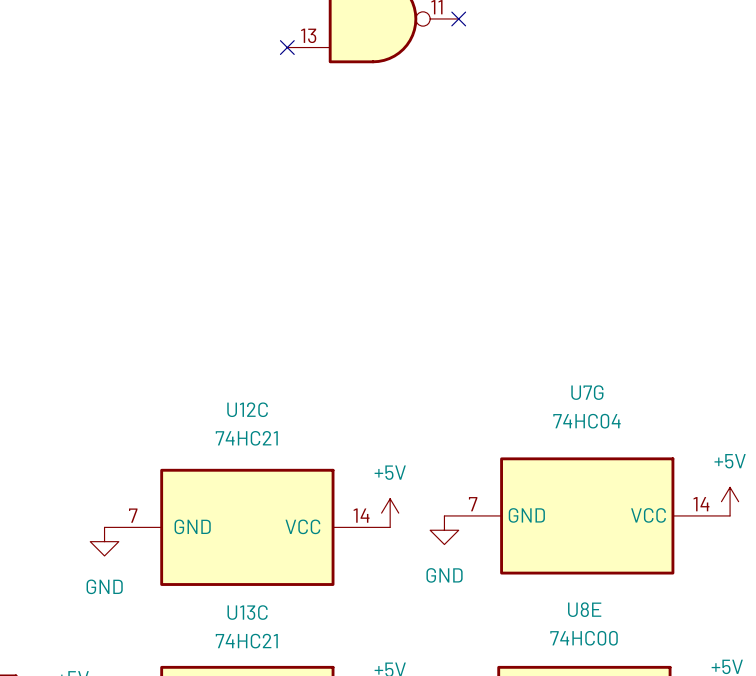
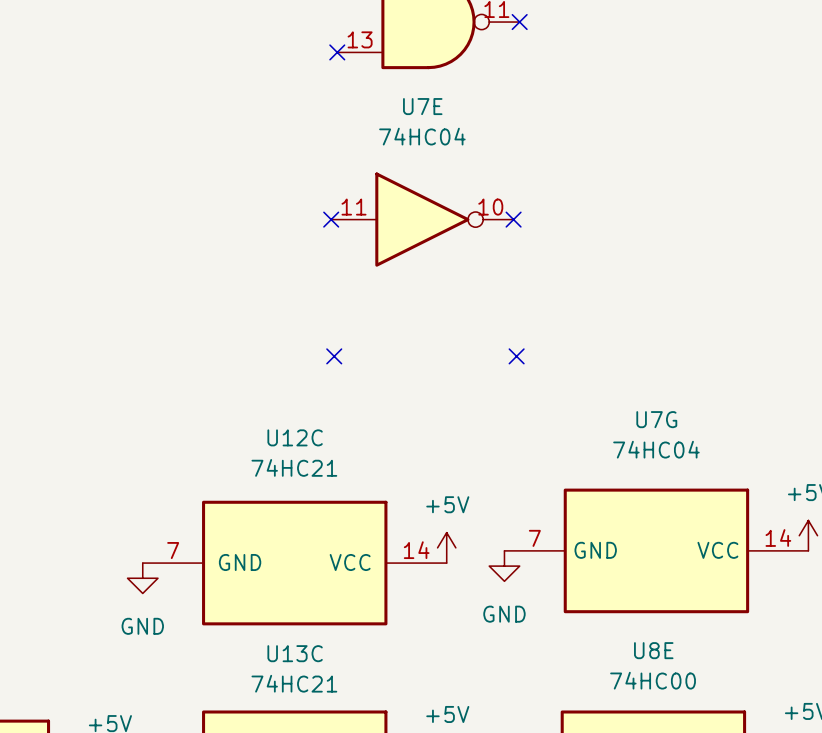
no-connect mark: none -> (331, 219)
U7E: none -> 74HC04 (422, 219)
no-connect mark: none -> (513, 219)
no-connect mark: none -> (334, 356)
no-connect mark: none -> (516, 356)

